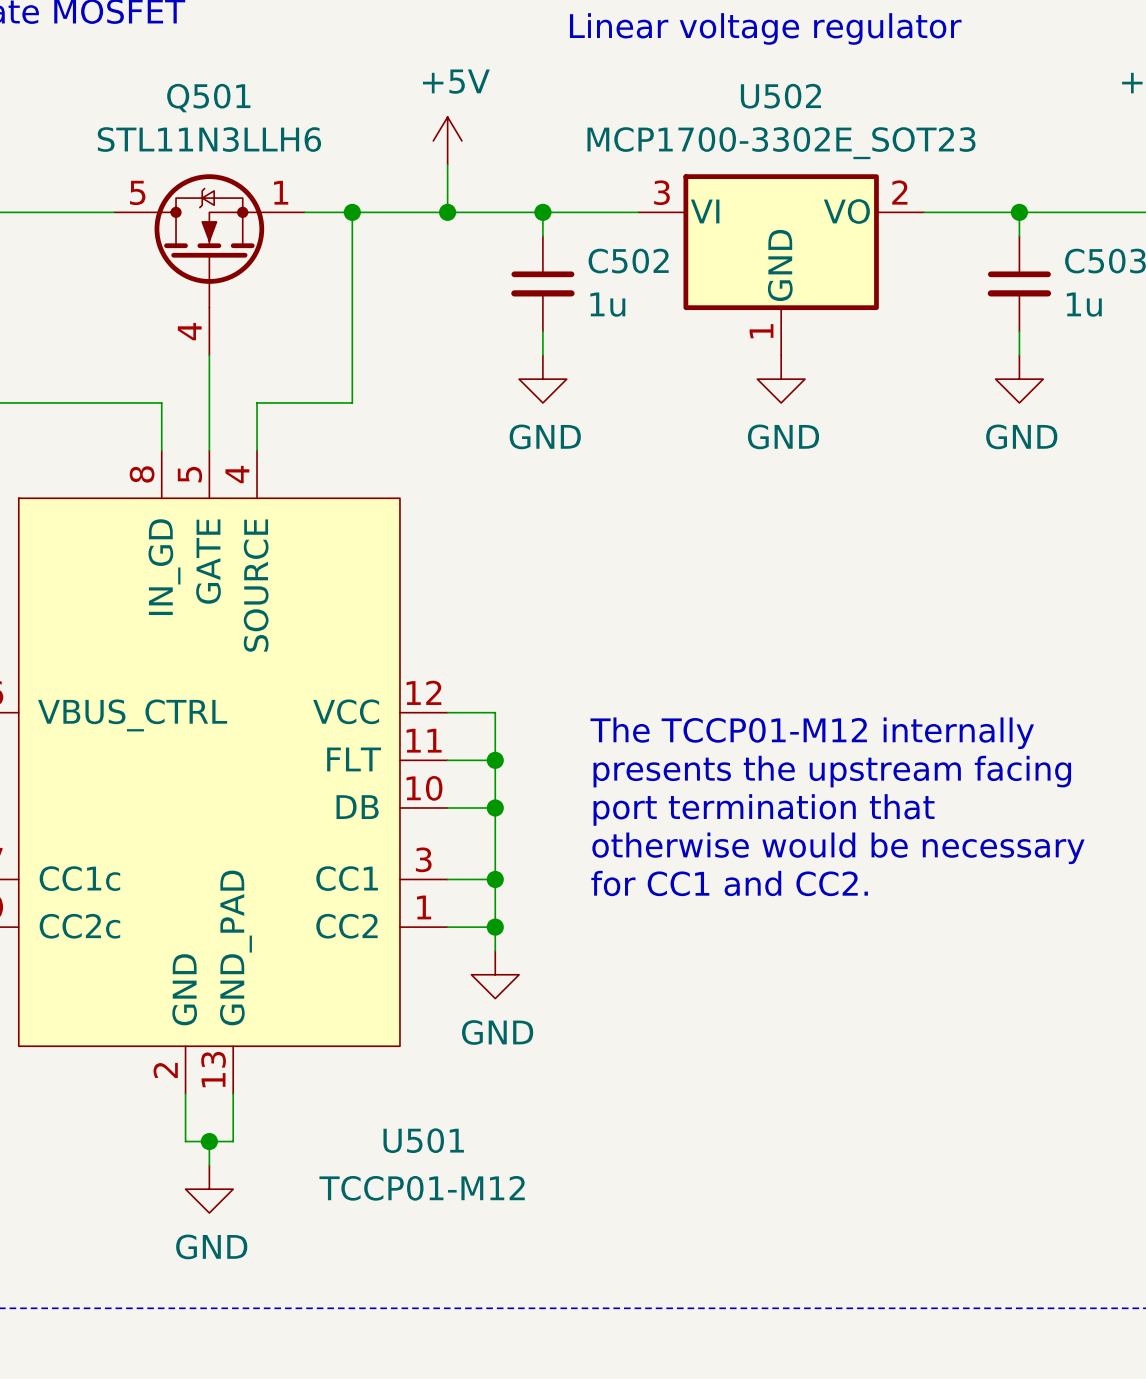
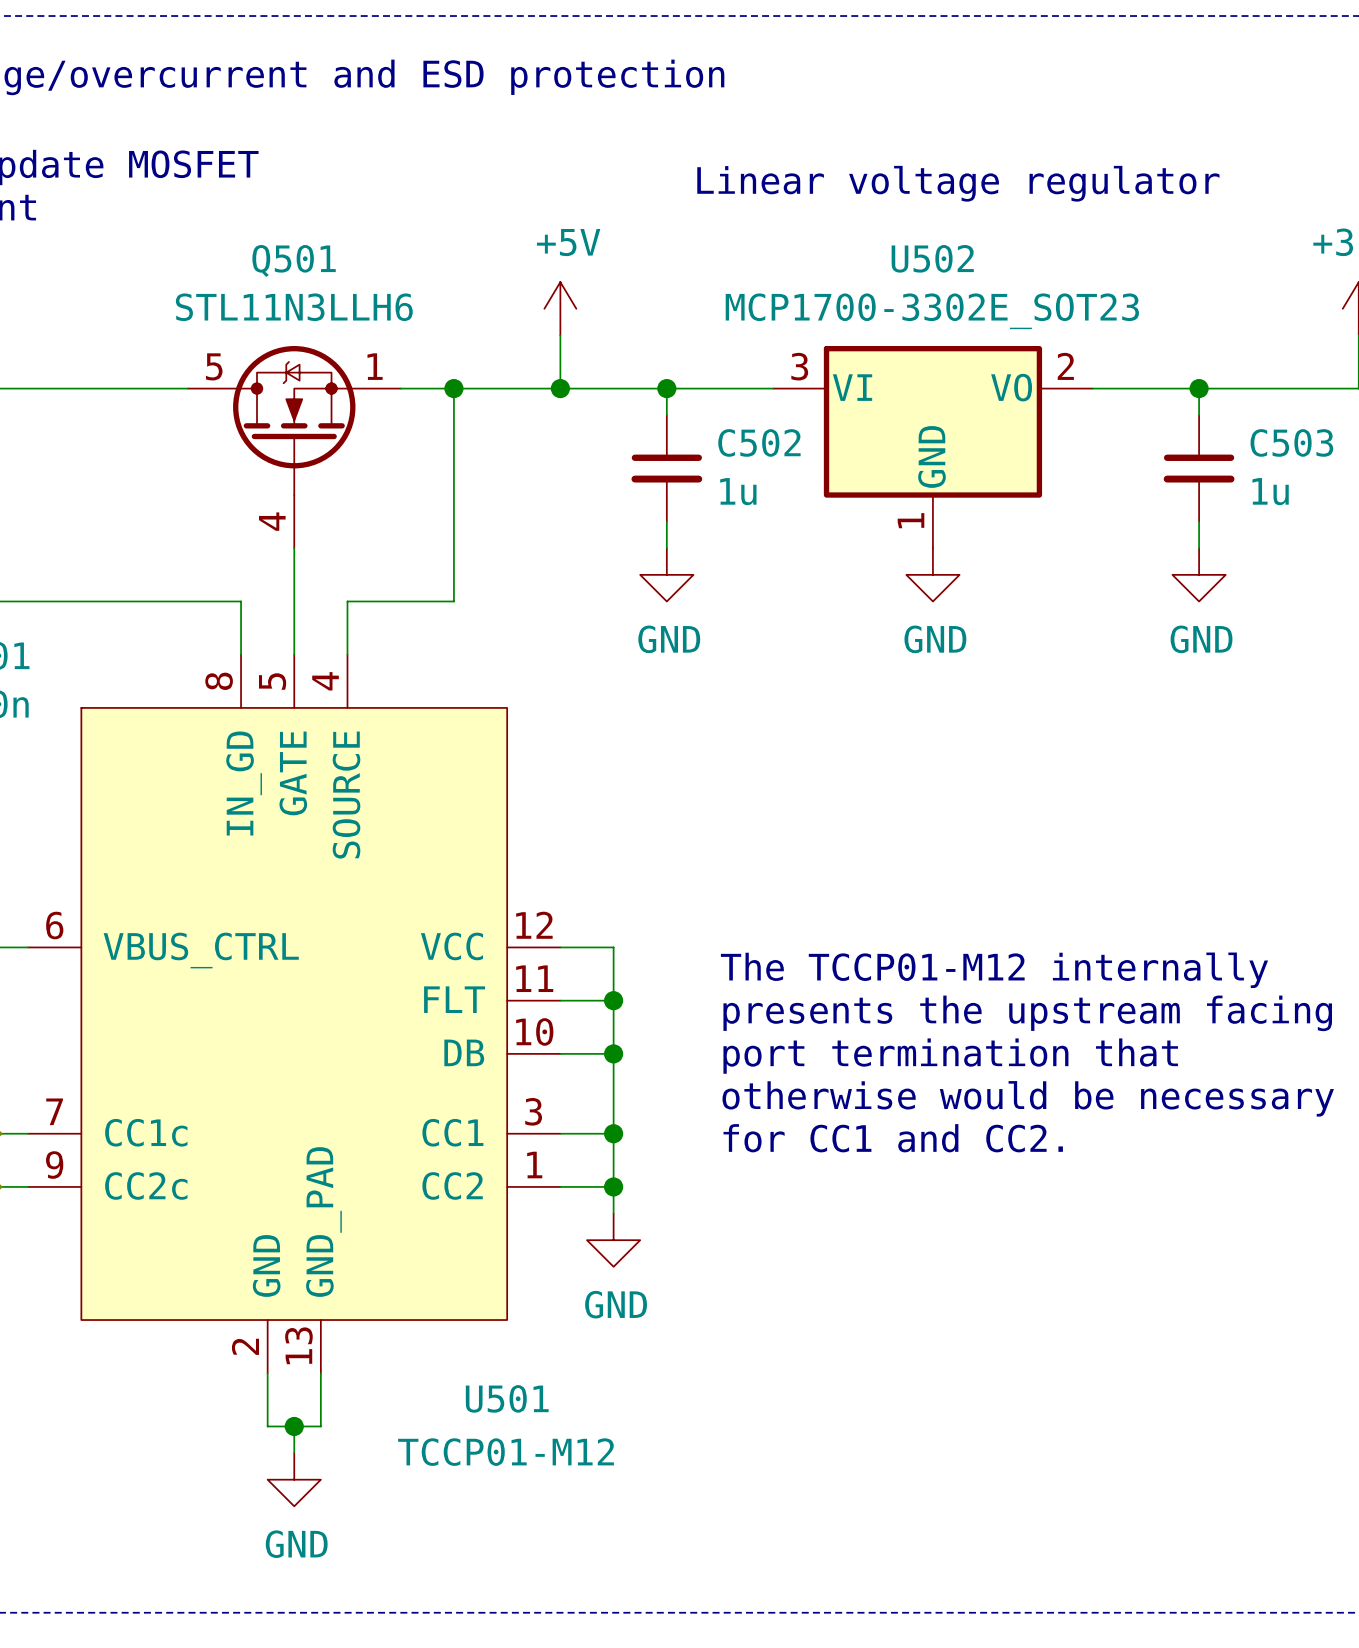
U501 name position: U501 (423, 1140) -> U501 (507, 1398)
U501 value position: TCCP01-M12 (422, 1188) -> TCCP01-M12 (506, 1452)

